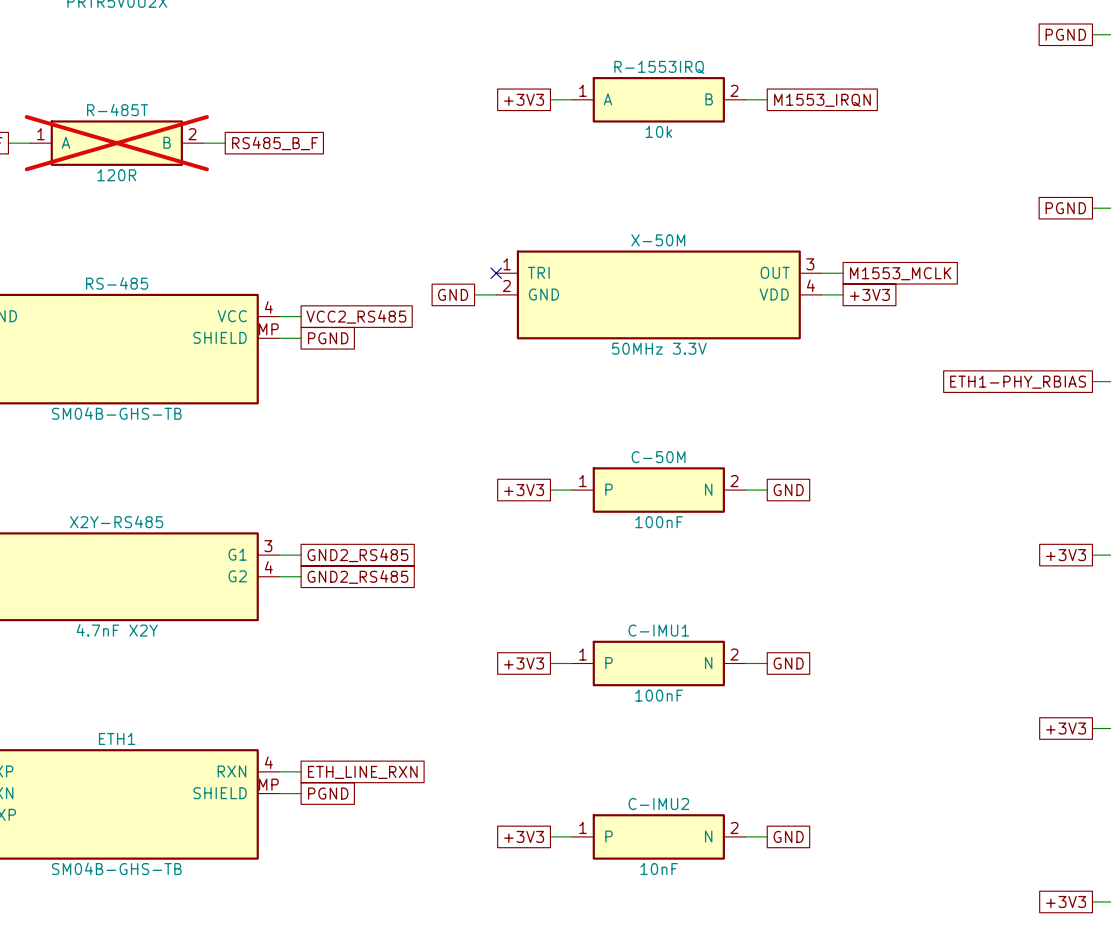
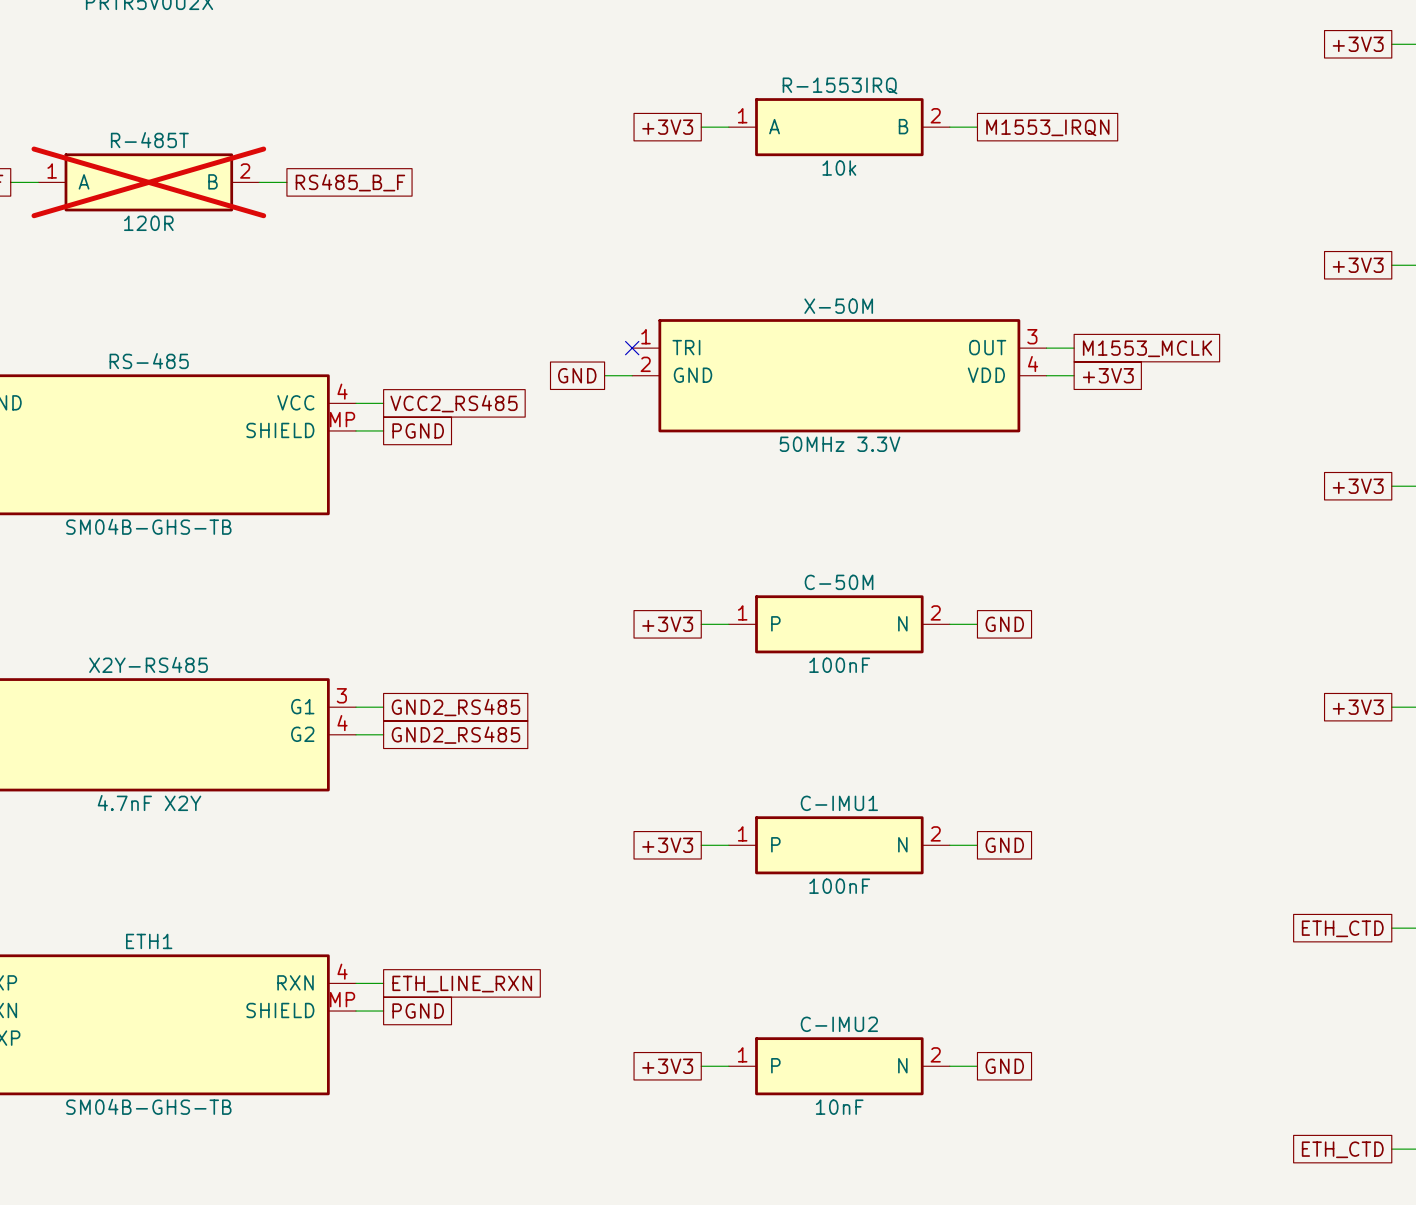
global label: PGND (1065, 34) -> +3V3 (1358, 44)
global label: PGND (1065, 208) -> +3V3 (1358, 265)
global label: ETH1-PHY_RBIAS (1018, 382) -> +3V3 (1358, 486)
global label: +3V3 (1066, 728) -> ETH_CTD (1342, 928)
global label: +3V3 (1066, 901) -> ETH_CTD (1342, 1149)

